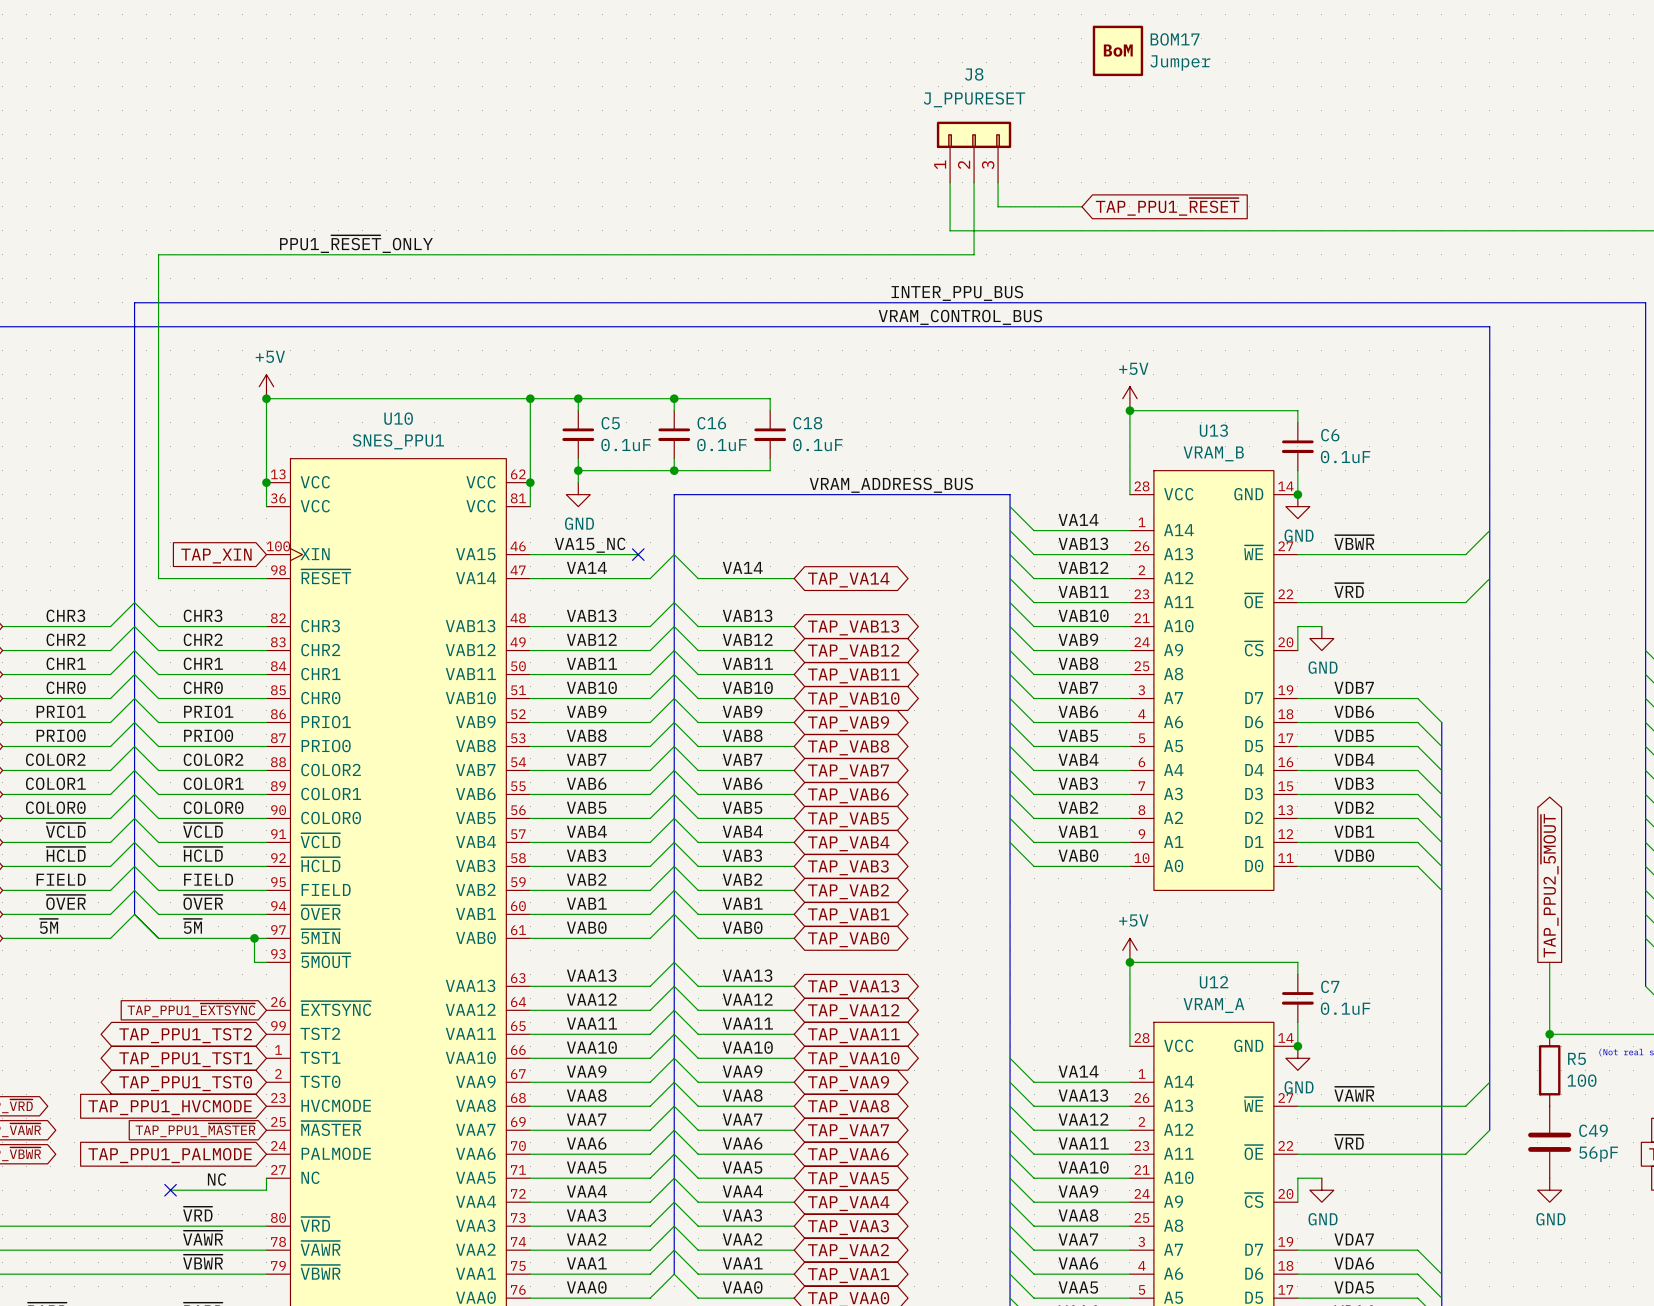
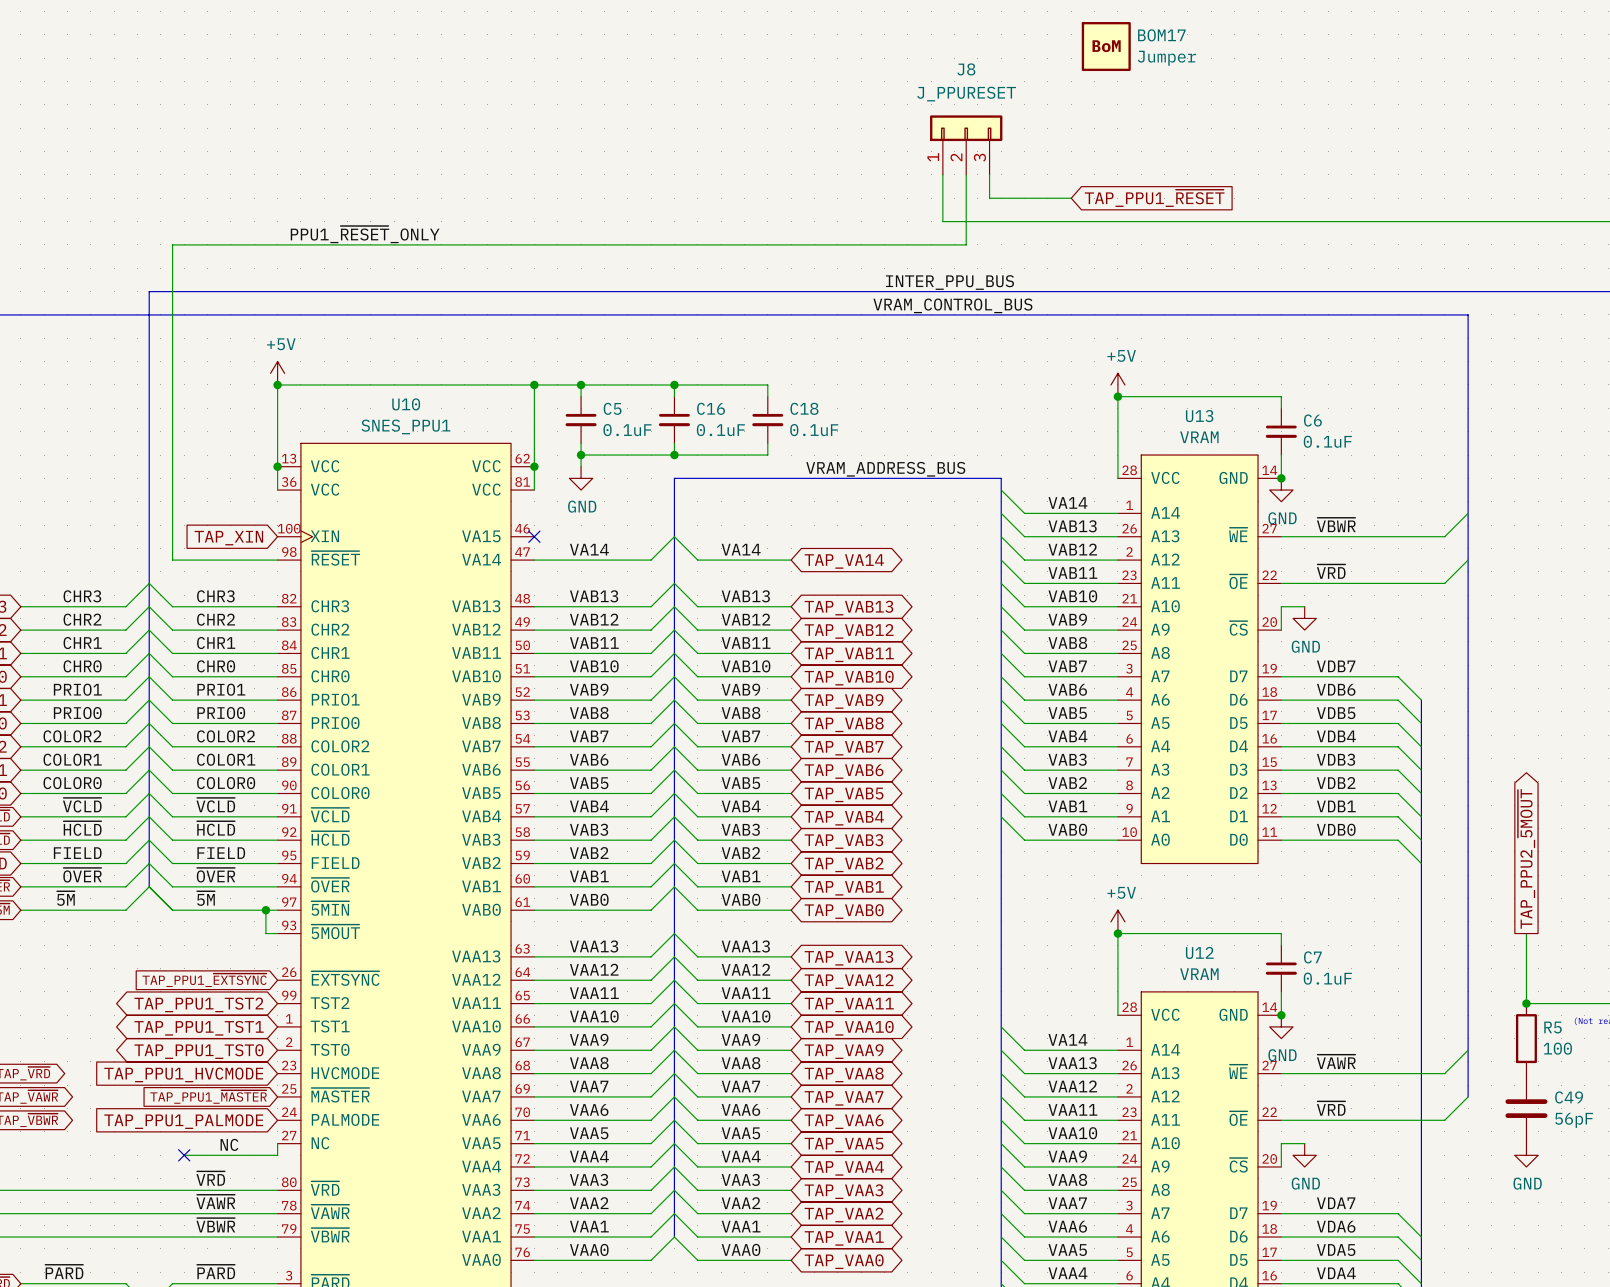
U13 value: VRAM_B (1213, 453) -> VRAM (1199, 437)
label: VA15_NC (590, 545) -> none
wire: (530, 554) (638, 554) -> none
no-connect mark: none -> (534, 536)
no-connect mark: (638, 554) -> none
U12 value: VRAM_A (1213, 1005) -> VRAM (1199, 974)

